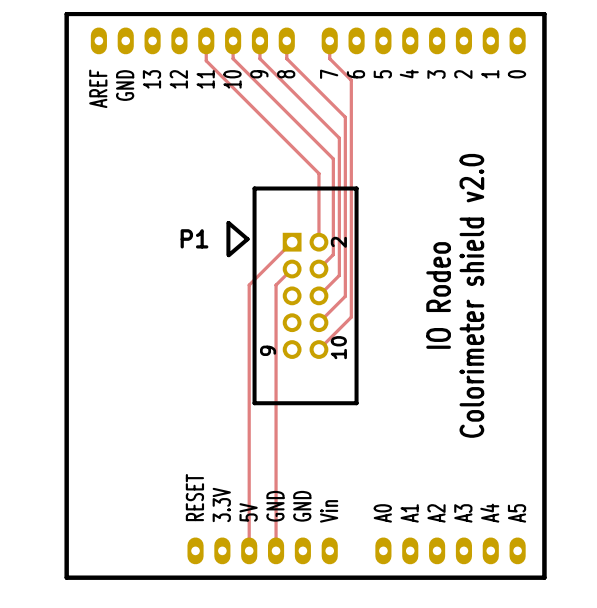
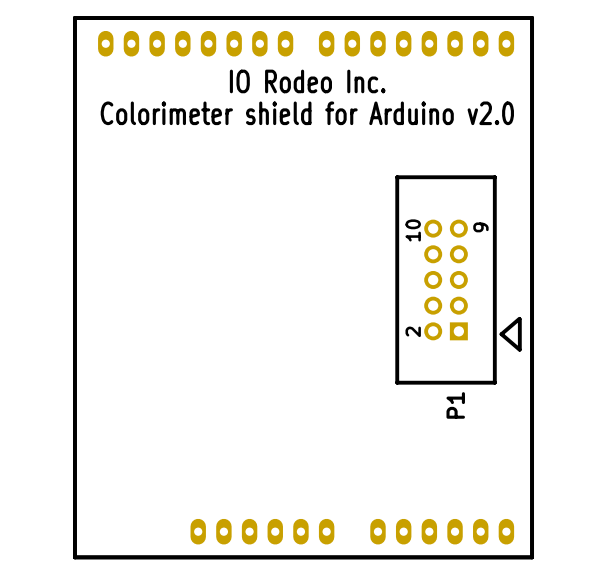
track: (206, 40) (206, 60) (318, 173) (318, 242) -> none
track: (233, 40) (233, 58) (333, 158) (333, 254) (318, 269) -> none
track: (259, 40) (259, 58) (339, 138) (339, 275) (318, 295) -> none
track: (286, 40) (286, 58) (345, 117) (345, 296) (318, 322) -> none
track: (329, 40) (329, 58) (351, 80) (351, 317) (318, 349) -> none
text: 9 (259, 74) -> none
text: 8 (286, 74) -> none
text: 7 (329, 74) -> none
text: 6 (355, 74) -> none
text: 5 (382, 74) -> none
text: 4 (409, 74) -> none
text: 3 (436, 74) -> none
text: 2 (463, 74) -> none
text: 1 (490, 74) -> none
text: 0 (517, 74) -> none
text: 13 (151, 79) -> none
text: 12 (178, 79) -> none
text: 11 (205, 79) -> none
text: 10 (232, 79) -> none
text: none -> IO Rodeo Inc. (307, 81)
text: GND (125, 85) -> none
text: AREF (98, 88) -> none
P1 name position: P1 (194, 238) -> P1 (455, 405)
track: (292, 242) (249, 285) (249, 550) -> none
track: (292, 269) (276, 285) (276, 550) -> none
P1 rotation: 0° (292, 295) -> 180° (458, 279)
P1 position: (292, 295) -> (458, 279)
text: IO Rodeo (438, 295) -> none
text: Colorimeter shield v2.0 (471, 295) -> Colorimeter shield for Arduino v2.0 (307, 113)
text: RESET (194, 497) -> none
text: 3.3V (221, 504) -> none
text: GND (275, 506) -> none
text: GND (302, 506) -> none
text: Vin (329, 511) -> none
text: 5V (248, 512) -> none
text: A0 (382, 513) -> none
text: A1 (409, 513) -> none
text: A2 (436, 513) -> none
text: A3 (463, 513) -> none
text: A4 (489, 513) -> none
text: A5 (517, 513) -> none

